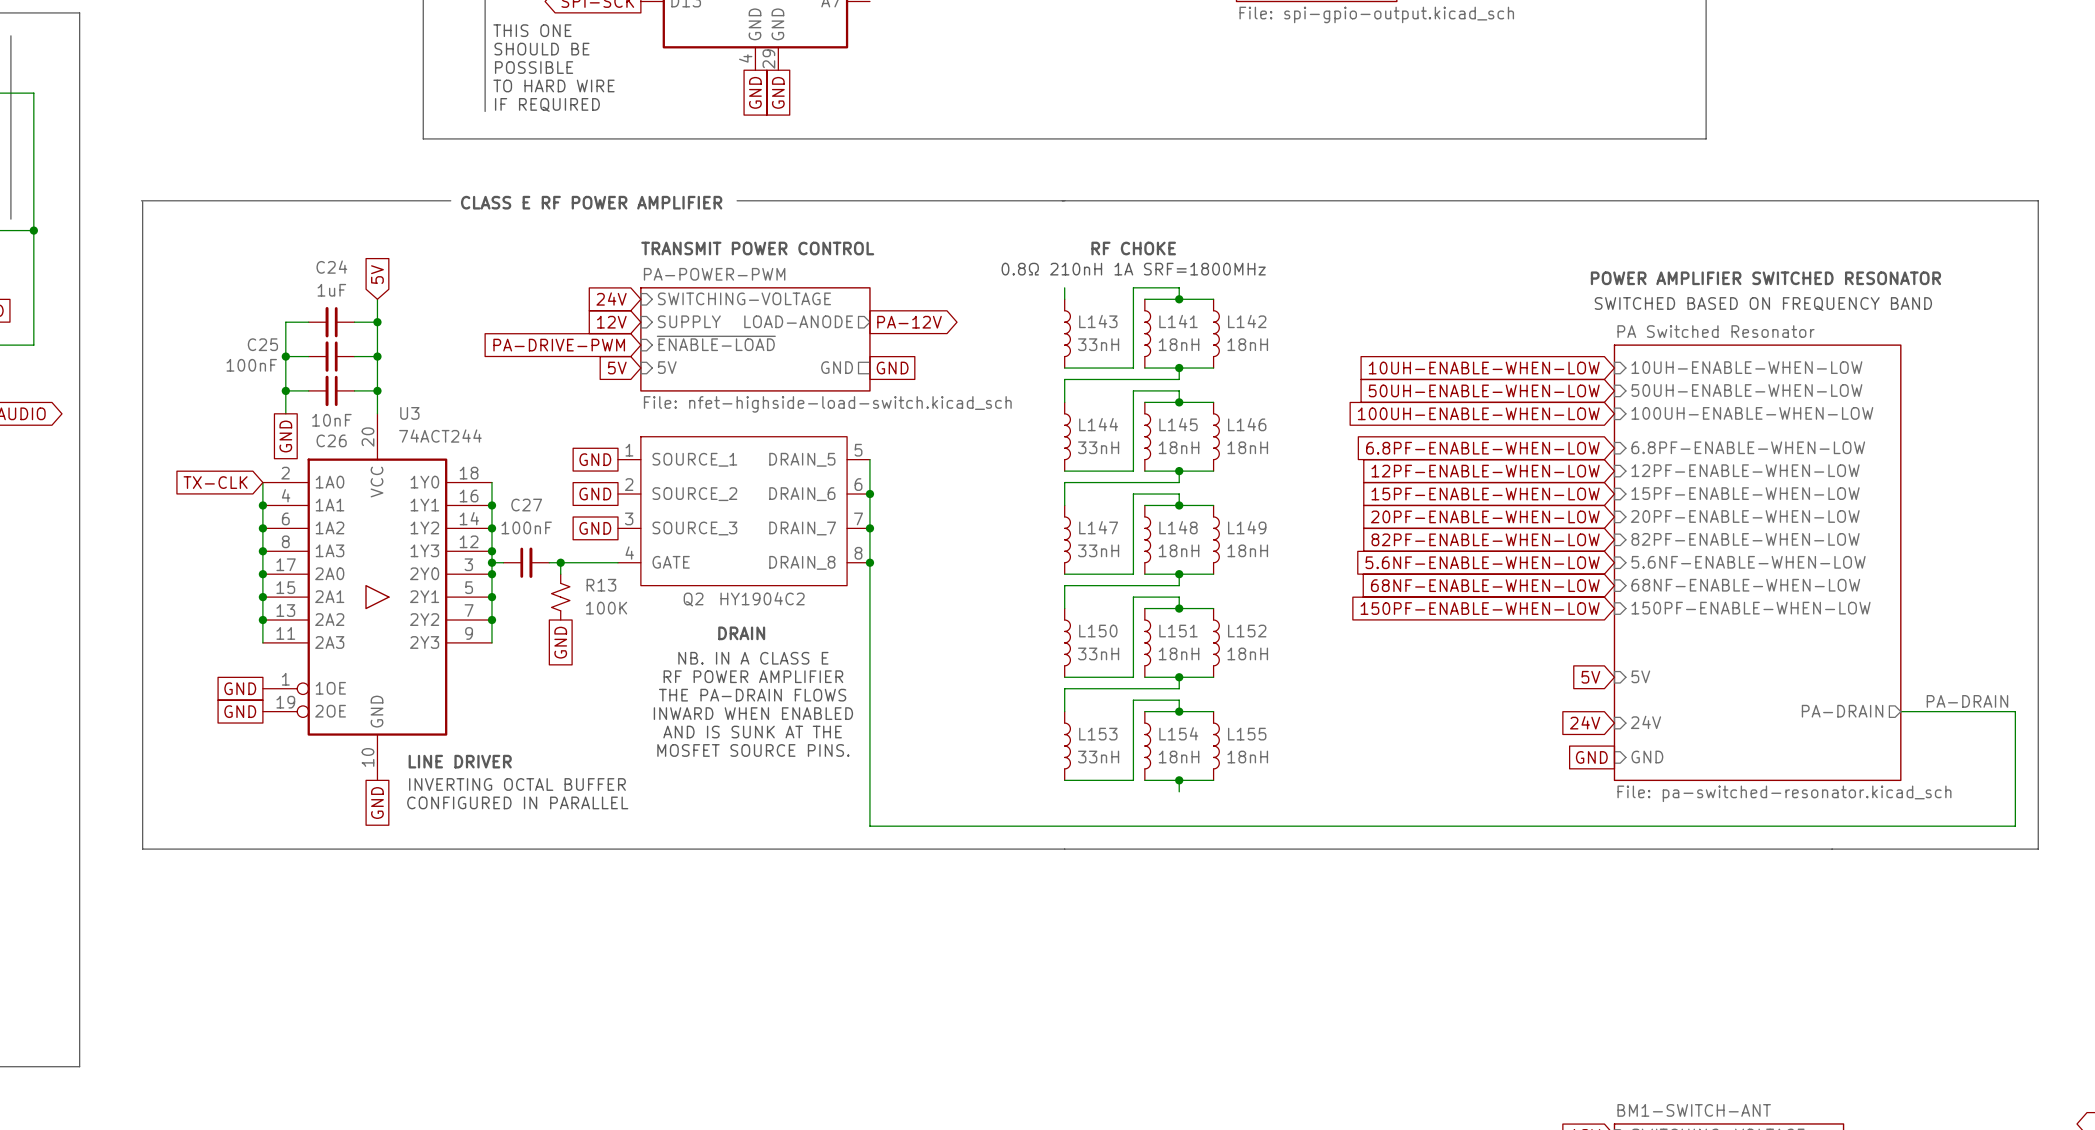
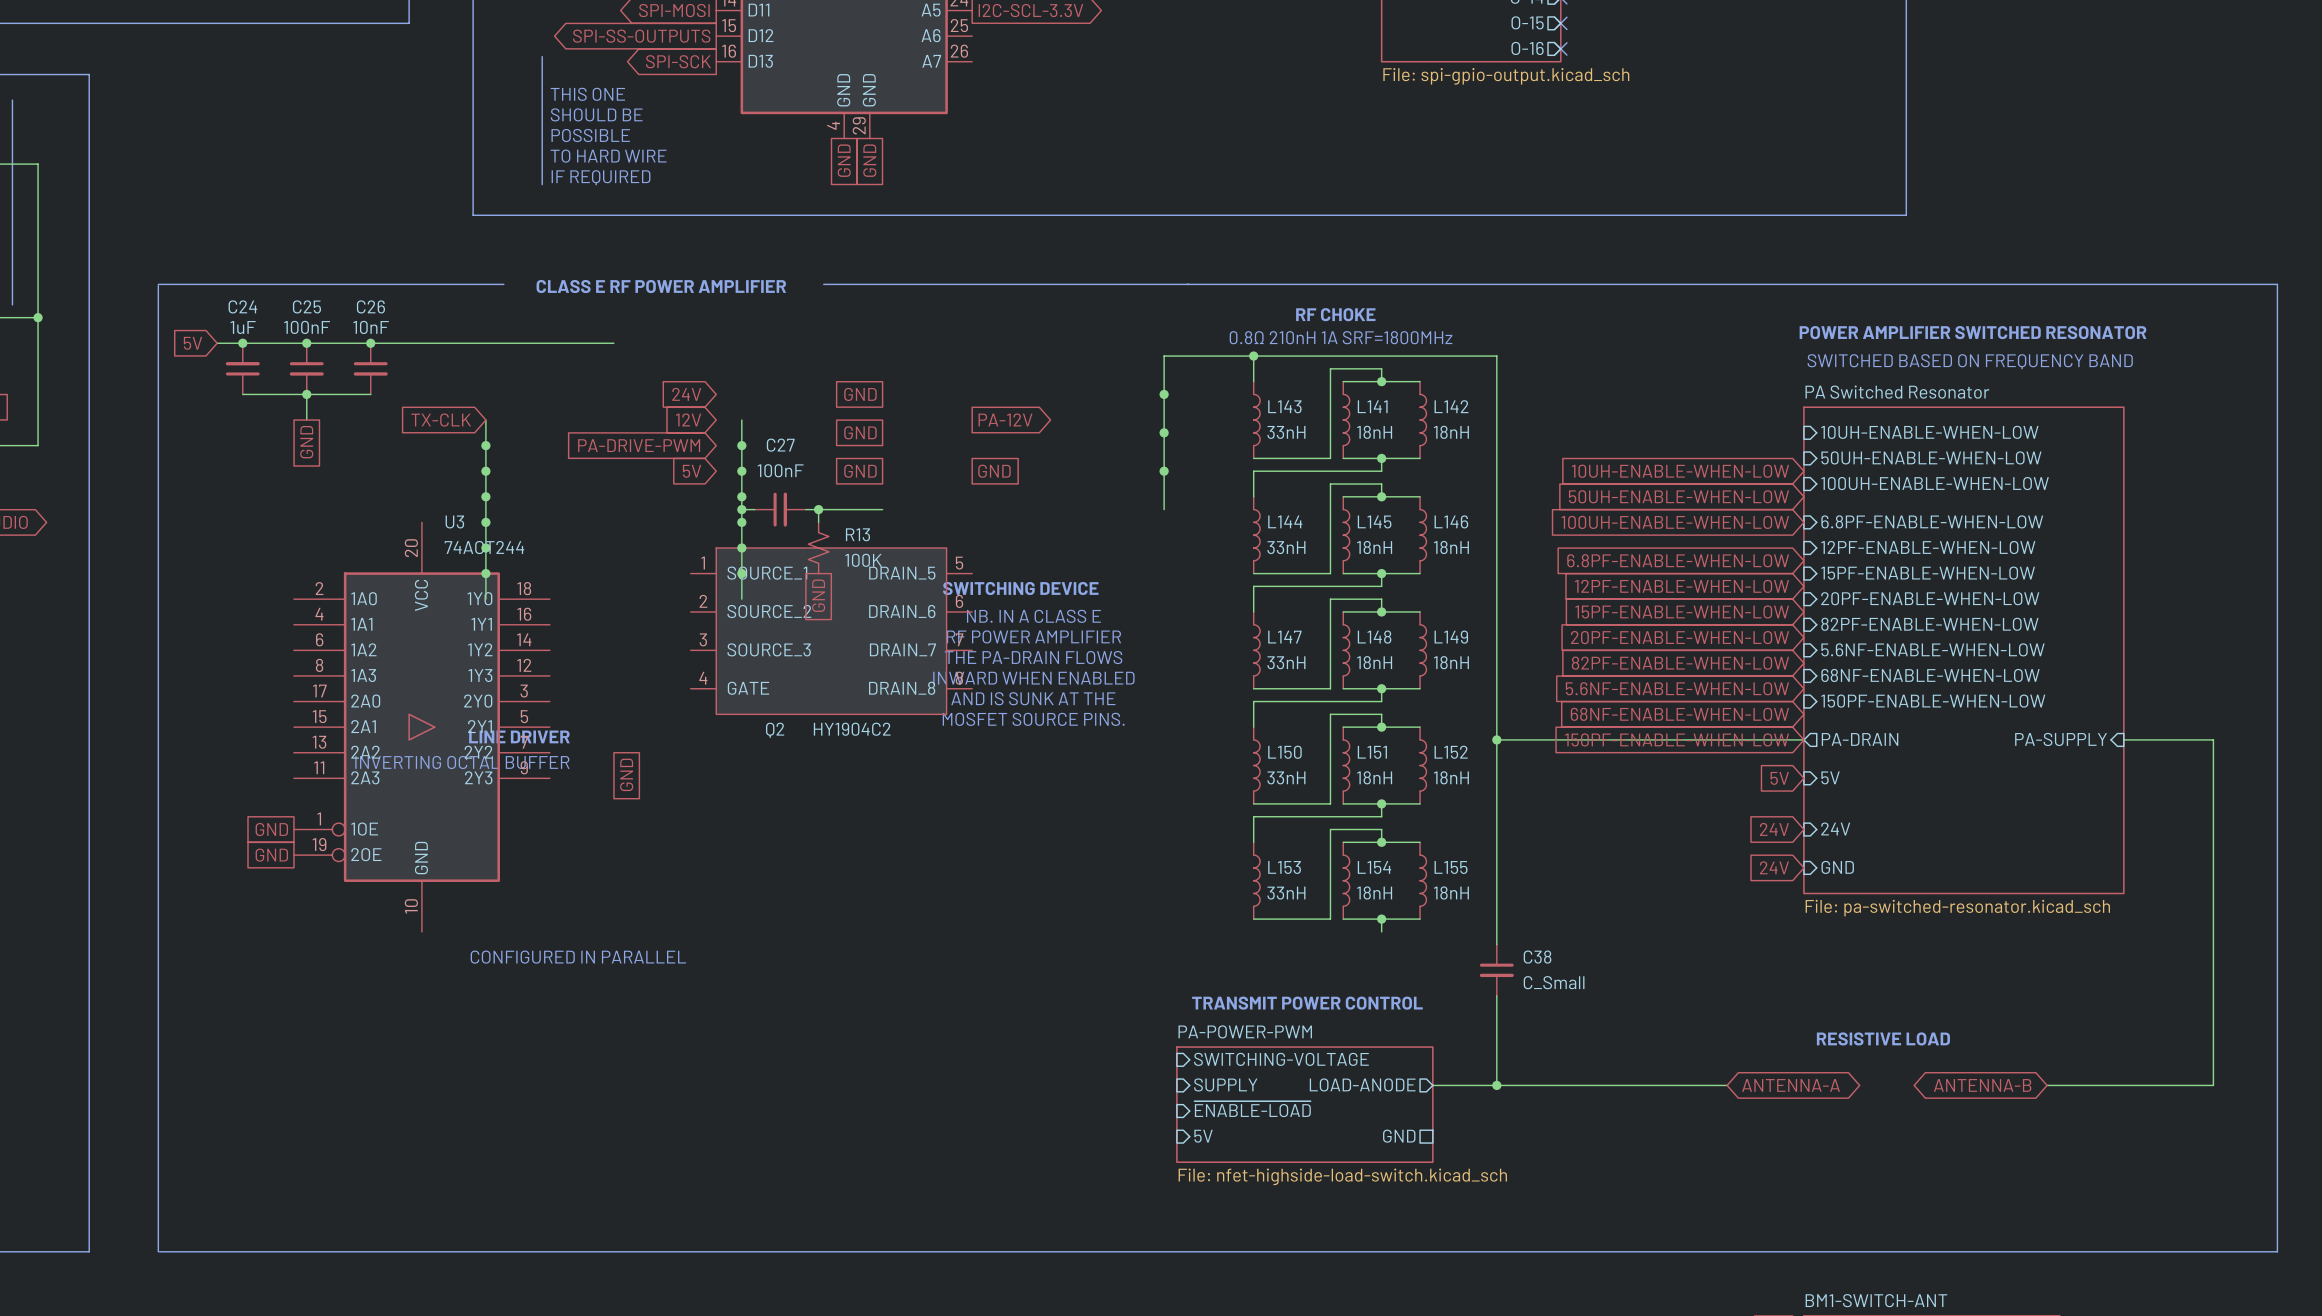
line: none -> (158, 285) (158, 1251)
line: (142, 201) (142, 849) (2038, 849) -> (159, 1251) (2277, 1251) (2277, 1008)
text: TRANSMIT POWER CONTROL (757, 248) -> none
text position: RF CHOKE (1133, 248) -> RF CHOKE (1335, 314)
wire: none -> (217, 343) (613, 343)
junction: none -> (242, 343)
junction: none -> (306, 343)
junction: none -> (370, 343)
wire: none -> (1253, 356) (1253, 381)
junction: none -> (1253, 356)
text position: 0.8Ω 210nH 1A SRF=1800MHz (1133, 269) -> 0.8Ω 210nH 1A SRF=1800MHz (1341, 337)
global label rotation: 0° (377, 274) -> 90° counterclockwise (193, 343)
global label position: 5V (377, 274) -> 5V (193, 343)
text position: POWER AMPLIFIER SWITCHED RESONATOR (1765, 278) -> POWER AMPLIFIER SWITCHED RESONATOR (1973, 332)
wire: (1064, 287) (1064, 299) -> none
wire: none -> (1381, 381) (1381, 368) (1330, 368) (1330, 458) (1253, 458)
junction: none -> (1381, 381)
sheet pin: SWITCHING-VOLTAGE (744, 298) -> none
wire: none -> (242, 394) (370, 394)
wire: none -> (306, 394) (306, 420)
junction: none -> (306, 394)
wire: (377, 299) (377, 413) -> none
global label: none -> GND (860, 394)
junction: none -> (1164, 394)
wire: (1144, 299) (1213, 299) -> (1343, 381) (1420, 381)
wire: (1179, 299) (1179, 287) (1133, 287) (1133, 368) -> (1279, 471) (1266, 471)
junction: (1179, 299) -> none
text position: SWITCHED BASED ON FREQUENCY BAND (1763, 304) -> SWITCHED BASED ON FREQUENCY BAND (1970, 361)
sheet pin: SUPPLY (689, 321) -> none
sheet pin: LOAD-ANODE (798, 321) -> none
wire: (308, 322) (285, 322) (285, 413) -> none
C24 rotation: 0° (331, 322) -> 90° clockwise (242, 368)
C24 position: (331, 322) -> (242, 368)
wire: (354, 322) (377, 322) -> none
junction: (377, 322) -> none
global label: none -> TX-CLK (441, 420)
wire: none -> (741, 420) (741, 599)
global label: none -> GND (860, 432)
junction: none -> (1164, 432)
L143 position: (1067, 333) -> (1256, 420)
L141 position: (1147, 333) -> (1346, 420)
L142 position: (1216, 333) -> (1423, 420)
sheet PA-POWER-PWM: File: nfet-highside-load-switch.kicad_sch (755, 339) -> none
sheet pin: ~{ENABLE-LOAD} (716, 343) -> none
C25 name position: C25 (262, 344) -> C25 (306, 306)
junction: none -> (485, 445)
junction: none -> (741, 445)
wire: (285, 356) (308, 356) -> none
junction: (285, 356) -> none
C25 rotation: 0° (331, 356) -> 90° counterclockwise (306, 368)
C25 position: (331, 356) -> (306, 368)
wire: (354, 356) (377, 356) -> none
junction: (377, 356) -> none
wire: none -> (1343, 458) (1420, 458)
wire: none -> (1381, 458) (1381, 471) (1356, 471)
junction: none -> (1381, 458)
C25 value position: 100nF (251, 365) -> 100nF (307, 327)
sheet pin: 5V (667, 367) -> none
sheet pin: GND (837, 367) -> none
sheet pin position: 10UH-ENABLE-WHEN-LOW (1746, 367) -> 10UH-ENABLE-WHEN-LOW (1929, 432)
junction: none -> (485, 471)
junction: none -> (741, 471)
global label: none -> GND (860, 471)
junction: none -> (1164, 471)
wire: (1064, 368) (1121, 368) -> (1253, 496) (1253, 471)
wire: (1179, 368) (1179, 379) (1064, 379) (1064, 402) -> none
junction: (1179, 368) -> none
sheet pin: none -> 100UH-ENABLE-WHEN-LOW (1935, 483)
wire: (285, 390) (308, 390) -> none
junction: (285, 390) -> none
C26 rotation: 0° (331, 390) -> 90° counterclockwise (370, 368)
C26 position: (331, 390) -> (370, 368)
wire: (354, 390) (377, 390) -> none
junction: (377, 390) -> none
junction: none -> (485, 496)
junction: none -> (741, 496)
wire: none -> (1381, 496) (1381, 484) (1330, 484) (1330, 573) (1253, 573)
junction: none -> (1381, 496)
sheet pin position: 50UH-ENABLE-WHEN-LOW (1746, 390) -> 50UH-ENABLE-WHEN-LOW (1931, 457)
wire: none -> (741, 509) (754, 509)
junction: none -> (741, 509)
wire: none -> (805, 509) (882, 509)
wire: none -> (818, 509) (818, 522)
junction: none -> (818, 509)
wire: none -> (1164, 509) (1164, 356) (1496, 356) (1496, 944)
wire: (1144, 402) (1213, 402) -> (1343, 496) (1420, 496)
wire: (1179, 402) (1179, 390) (1133, 390) (1133, 471) -> (1279, 586) (1266, 586)
junction: (1179, 402) -> none
junction: none -> (485, 522)
junction: none -> (741, 522)
sheet pin: 100UH-ENABLE-WHEN-LOW (1752, 413) -> 6.8PF-ENABLE-WHEN-LOW (1932, 521)
C26 value position: 10nF (331, 420) -> 10nF (371, 327)
global label position: GND (285, 436) -> GND (306, 442)
junction: none -> (485, 547)
junction: none -> (741, 547)
L144 position: (1067, 436) -> (1256, 535)
L145 position: (1147, 436) -> (1346, 535)
L146 position: (1216, 436) -> (1423, 535)
C26 name position: C26 (331, 440) -> C26 (370, 306)
sheet pin: 6.8PF-ENABLE-WHEN-LOW (1748, 447) -> none
junction: none -> (485, 573)
global label: GND (595, 459) -> none
junction: none -> (741, 573)
wire: (869, 459) (869, 826) (2015, 826) (2015, 711) (1900, 711) -> none
wire: none -> (1343, 573) (1420, 573)
wire: none -> (1381, 573) (1381, 586) (1356, 586)
junction: none -> (1381, 573)
sheet pin position: 12PF-ENABLE-WHEN-LOW (1745, 470) -> 12PF-ENABLE-WHEN-LOW (1928, 547)
wire: (1064, 471) (1121, 471) -> (1253, 611) (1253, 586)
wire: (1179, 471) (1179, 482) (1064, 482) (1064, 505) -> none
junction: (1179, 471) -> none
text: none -> SWITCHING DEVICE (1020, 588)
global label: TX-CLK (215, 482) -> none
wire: (262, 482) (262, 642) -> none
wire: (491, 482) (491, 642) -> (485, 420) (485, 599)
global label: none -> GND (818, 595)
sheet pin position: 15PF-ENABLE-WHEN-LOW (1745, 493) -> 15PF-ENABLE-WHEN-LOW (1928, 573)
global label: GND (595, 494) -> none
junction: (869, 494) -> none
wire: none -> (1381, 611) (1381, 599) (1330, 599) (1330, 688) (1253, 688)
junction: none -> (1381, 611)
text: none -> NB. IN A CLASS E (1033, 616)
junction: (262, 505) -> none
junction: (491, 505) -> none
wire: (1144, 505) (1213, 505) -> (1343, 611) (1420, 611)
wire: (1179, 505) (1179, 494) (1133, 494) (1133, 574) -> (1279, 701) (1266, 701)
junction: (1179, 505) -> none
text: none -> RF POWER AMPLIFIER (1034, 636)
sheet pin position: 20PF-ENABLE-WHEN-LOW (1745, 516) -> 20PF-ENABLE-WHEN-LOW (1930, 598)
junction: (262, 528) -> none
junction: (491, 528) -> none
global label: GND (595, 528) -> none
junction: (869, 528) -> none
text: none -> THE PA-DRAIN FLOWS (1033, 657)
L147 position: (1067, 539) -> (1256, 650)
L148 position: (1147, 539) -> (1346, 650)
L149 position: (1216, 539) -> (1423, 650)
sheet pin position: 82PF-ENABLE-WHEN-LOW (1745, 539) -> 82PF-ENABLE-WHEN-LOW (1929, 624)
junction: (262, 551) -> none
junction: (491, 551) -> none
text: none -> INWARD WHEN ENABLED (1033, 678)
wire: (491, 562) (503, 562) -> none
junction: (491, 562) -> none
C27 position: (526, 562) -> (780, 509)
wire: (549, 562) (617, 562) -> none
wire: (560, 562) (560, 574) -> none
junction: (560, 562) -> none
junction: (869, 562) -> none
wire: none -> (1343, 688) (1420, 688)
wire: none -> (1381, 688) (1381, 701) (1356, 701)
junction: none -> (1381, 688)
sheet pin position: 5.6NF-ENABLE-WHEN-LOW (1748, 562) -> 5.6NF-ENABLE-WHEN-LOW (1932, 649)
sheet PA Switched Resonator position: (1757, 562) -> (1963, 650)
text: none -> AND IS SUNK AT THE (1033, 698)
sheet pin: none -> 150PF-ENABLE-WHEN-LOW (1933, 701)
junction: (262, 574) -> none
junction: (491, 574) -> none
wire: (1064, 574) (1121, 574) -> (1253, 727) (1253, 701)
wire: (1179, 574) (1179, 585) (1064, 585) (1064, 608) -> none
junction: (1179, 574) -> none
sheet pin position: 68NF-ENABLE-WHEN-LOW (1745, 585) -> 68NF-ENABLE-WHEN-LOW (1930, 675)
text: none -> MOSFET SOURCE PINS. (1033, 719)
junction: (262, 597) -> none
junction: (491, 597) -> none
R13 position: (560, 597) -> (818, 547)
wire: none -> (1381, 727) (1381, 714) (1330, 714) (1330, 803) (1253, 803)
junction: none -> (1381, 727)
wire: (1144, 608) (1213, 608) -> (1343, 727) (1420, 727)
wire: (1179, 608) (1179, 597) (1133, 597) (1133, 677) -> (1279, 816) (1266, 816)
junction: (1179, 608) -> none
wire: none -> (1496, 739) (1803, 739)
junction: none -> (1496, 739)
sheet pin shape: input (1751, 608) -> output (1860, 739)
sheet pin: 150PF-ENABLE-WHEN-LOW (1751, 608) -> PA-DRAIN (1860, 739)
sheet pin: none -> PA-SUPPLY (2061, 739)
wire: none -> (2123, 739) (2213, 739) (2213, 1085) (2047, 1085)
junction: (262, 620) -> none
junction: (491, 620) -> none
text: DRAIN (741, 633) -> none
L150 position: (1067, 642) -> (1256, 765)
L151 position: (1147, 642) -> (1346, 765)
L152 position: (1216, 642) -> (1423, 765)
text: NB. IN A CLASS E (753, 658) -> none
wire: none -> (1343, 803) (1420, 803)
wire: none -> (1381, 803) (1381, 816) (1356, 816)
junction: none -> (1381, 803)
text: RF POWER AMPLIFIER (753, 676) -> none
sheet pin position: 5V (1640, 676) -> 5V (1830, 777)
wire: (1064, 677) (1121, 677) -> (1253, 842) (1253, 816)
wire: (1179, 677) (1179, 688) (1064, 688) (1064, 711) -> none
junction: (1179, 677) -> none
global label position: 5V (1590, 677) -> 5V (1779, 778)
global label: none -> 24V (1774, 829)
sheet pin: none -> 24V (1835, 828)
text: THE PA-DRAIN FLOWS (752, 695) -> none
junction: none -> (1381, 842)
label: PA-DRAIN (1967, 701) -> none
wire: (1144, 711) (1213, 711) -> (1343, 842) (1420, 842)
wire: (1179, 711) (1179, 700) (1133, 700) (1133, 780) (1064, 780) -> (1381, 842) (1381, 829) (1330, 829) (1330, 919) (1253, 919)
junction: (1179, 711) -> none
sheet pin: PA-DRAIN (1842, 711) -> none
text: INWARD WHEN ENABLED (753, 713) -> none
sheet pin: 24V (1646, 722) -> GND (1837, 867)
text: AND IS SUNK AT THE (752, 732) -> none
L153 position: (1067, 746) -> (1256, 880)
L154 position: (1147, 746) -> (1346, 880)
L155 position: (1216, 746) -> (1423, 880)
text: MOSFET SOURCE PINS. (753, 750) -> none
global label: GND (1591, 757) -> none
sheet pin: GND (1647, 757) -> none
text position: LINE DRIVER (460, 761) -> LINE DRIVER (519, 736)
junction: none -> (1381, 919)
wire: (1144, 780) (1213, 780) -> (1343, 919) (1420, 919)
wire: (1179, 780) (1179, 791) -> (1381, 919) (1381, 931)
junction: (1179, 780) -> none
text position: INVERTING OCTAL BUFFER (517, 784) -> INVERTING OCTAL BUFFER (462, 762)
global label: GND (377, 803) -> none
C38: none -> C_Small (1496, 970)
wire: none -> (1496, 995) (1496, 1085)
text: none -> TRANSMIT POWER CONTROL (1307, 1003)
text: none -> RESISTIVE LOAD (1883, 1038)
sheet pin: none -> SWITCHING-VOLTAGE (1281, 1059)
sheet pin: none -> SUPPLY (1225, 1084)
sheet pin: none -> LOAD-ANODE (1362, 1084)
wire: none -> (1432, 1085) (1727, 1085)
junction: none -> (1496, 1085)
global label: none -> ANTENNA-A (1791, 1085)
global label: none -> ANTENNA-B (1982, 1085)
sheet PA-POWER-PWM: none -> File: nfet-highside-load-switch.kicad_sch (1304, 1104)
sheet pin: none -> ~{ENABLE-LOAD} (1252, 1109)
sheet pin: none -> 5V (1203, 1136)
sheet pin: none -> GND (1399, 1136)

